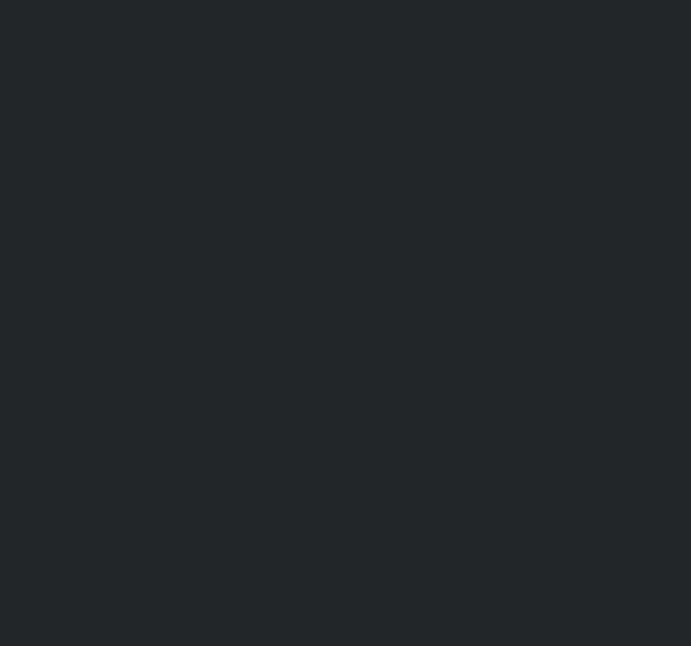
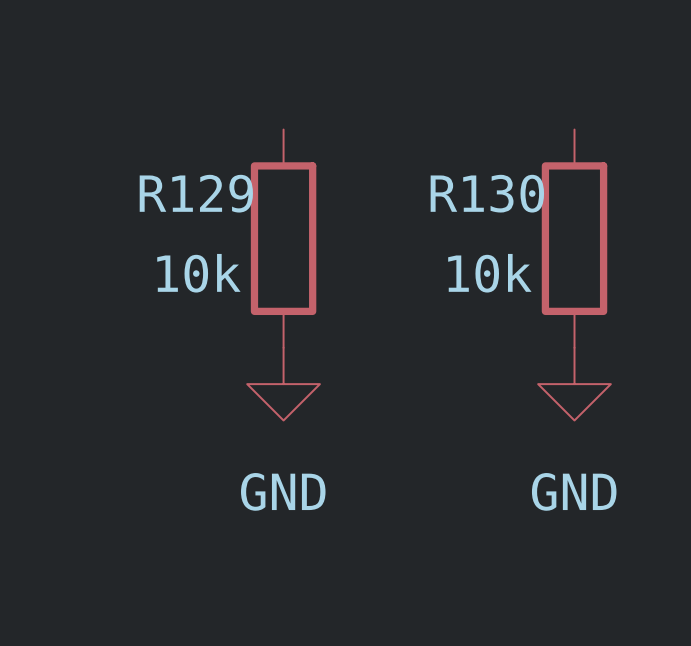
R129: none -> 10k (283, 238)
R130: none -> 10k (574, 238)
power symbol: none -> GND (283, 384)
power symbol: none -> GND (574, 384)

